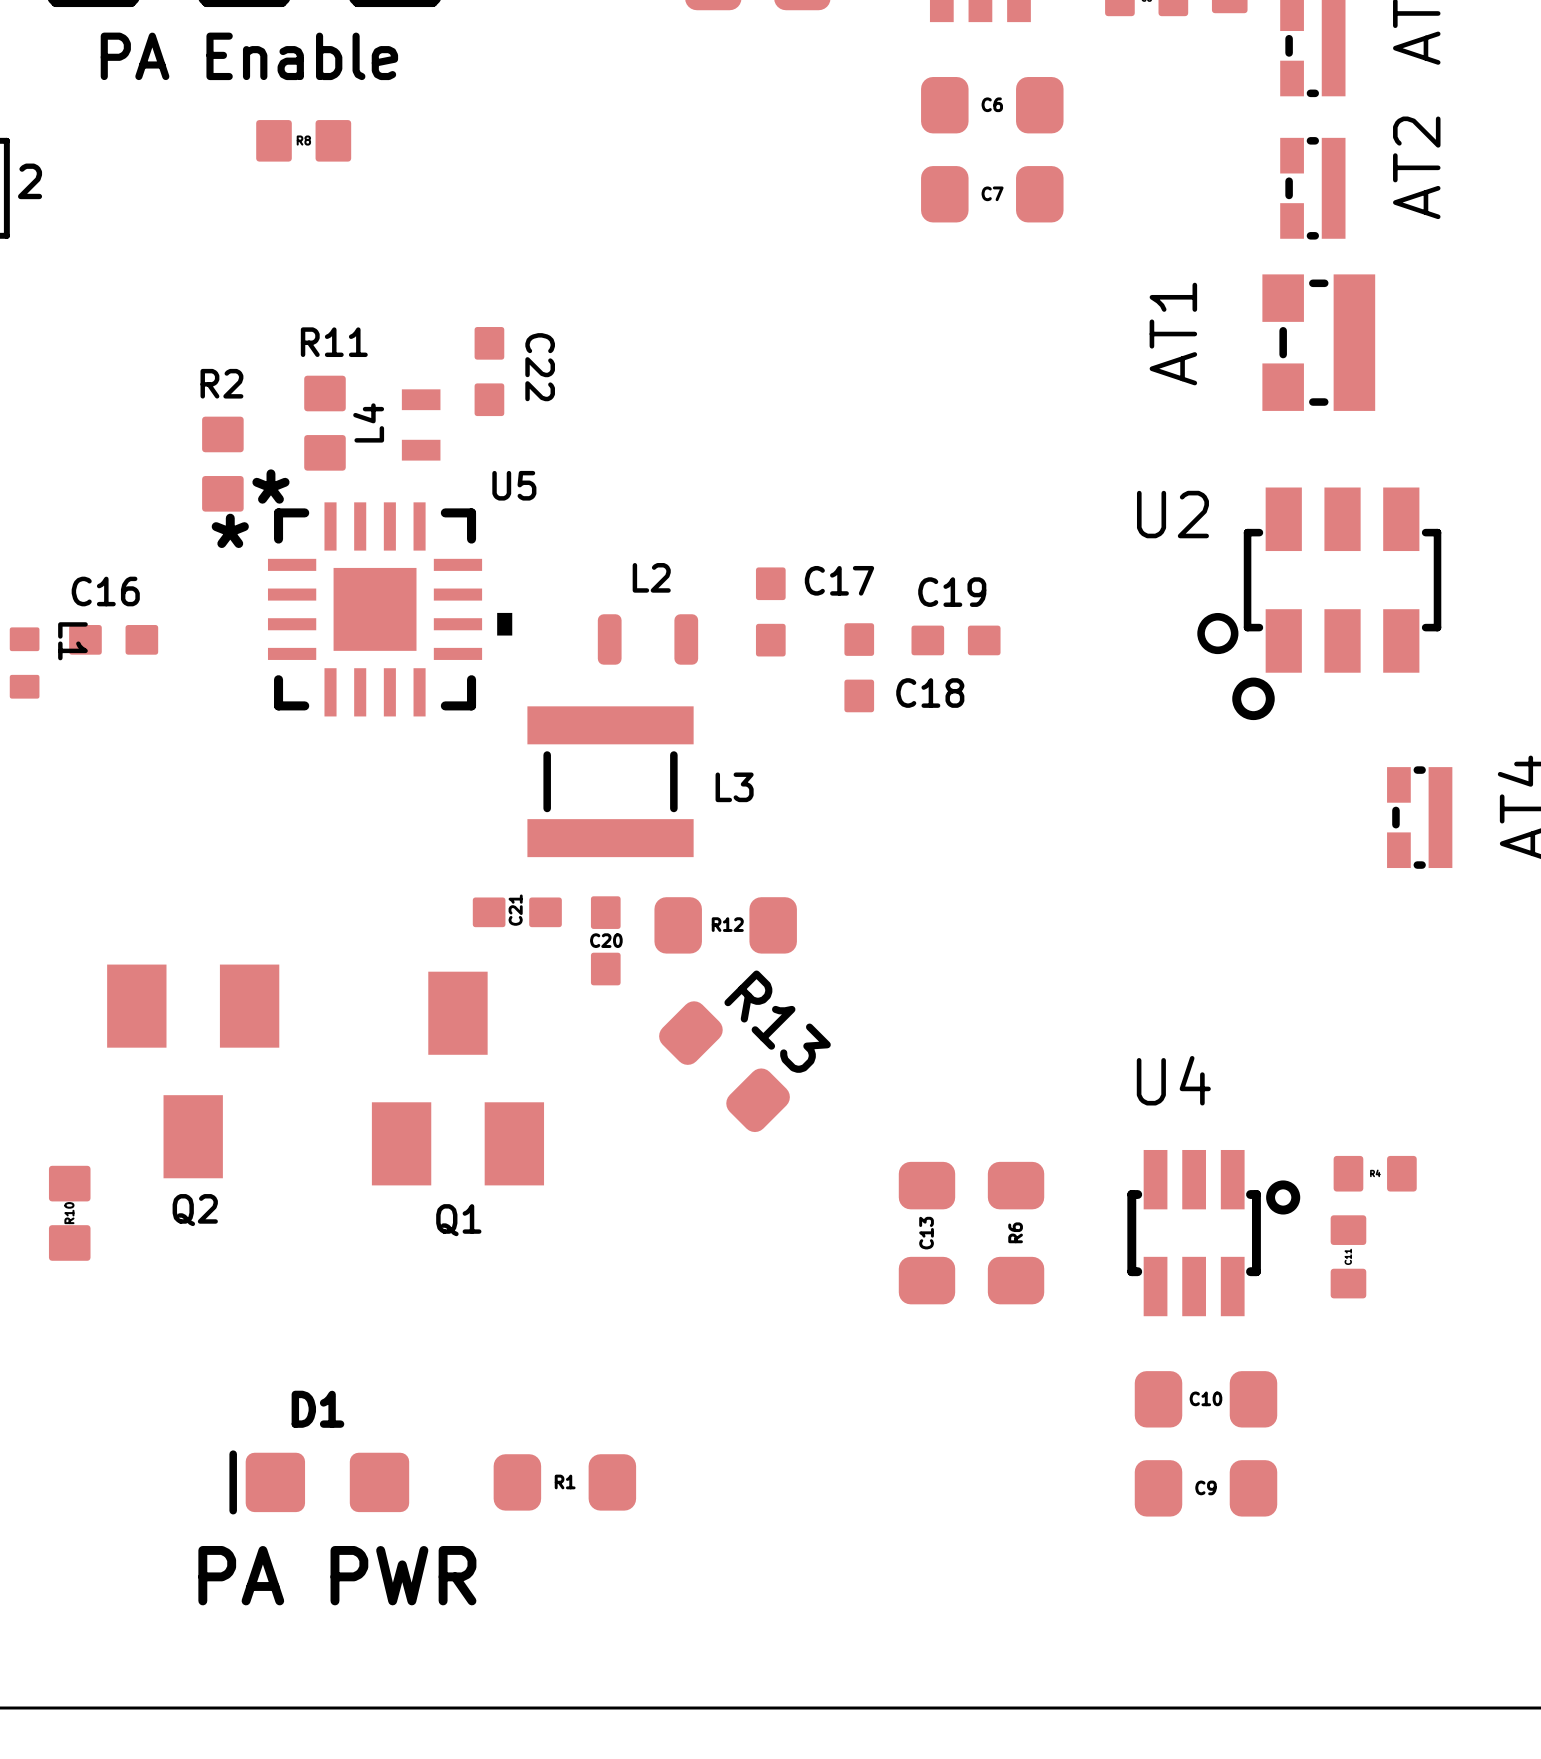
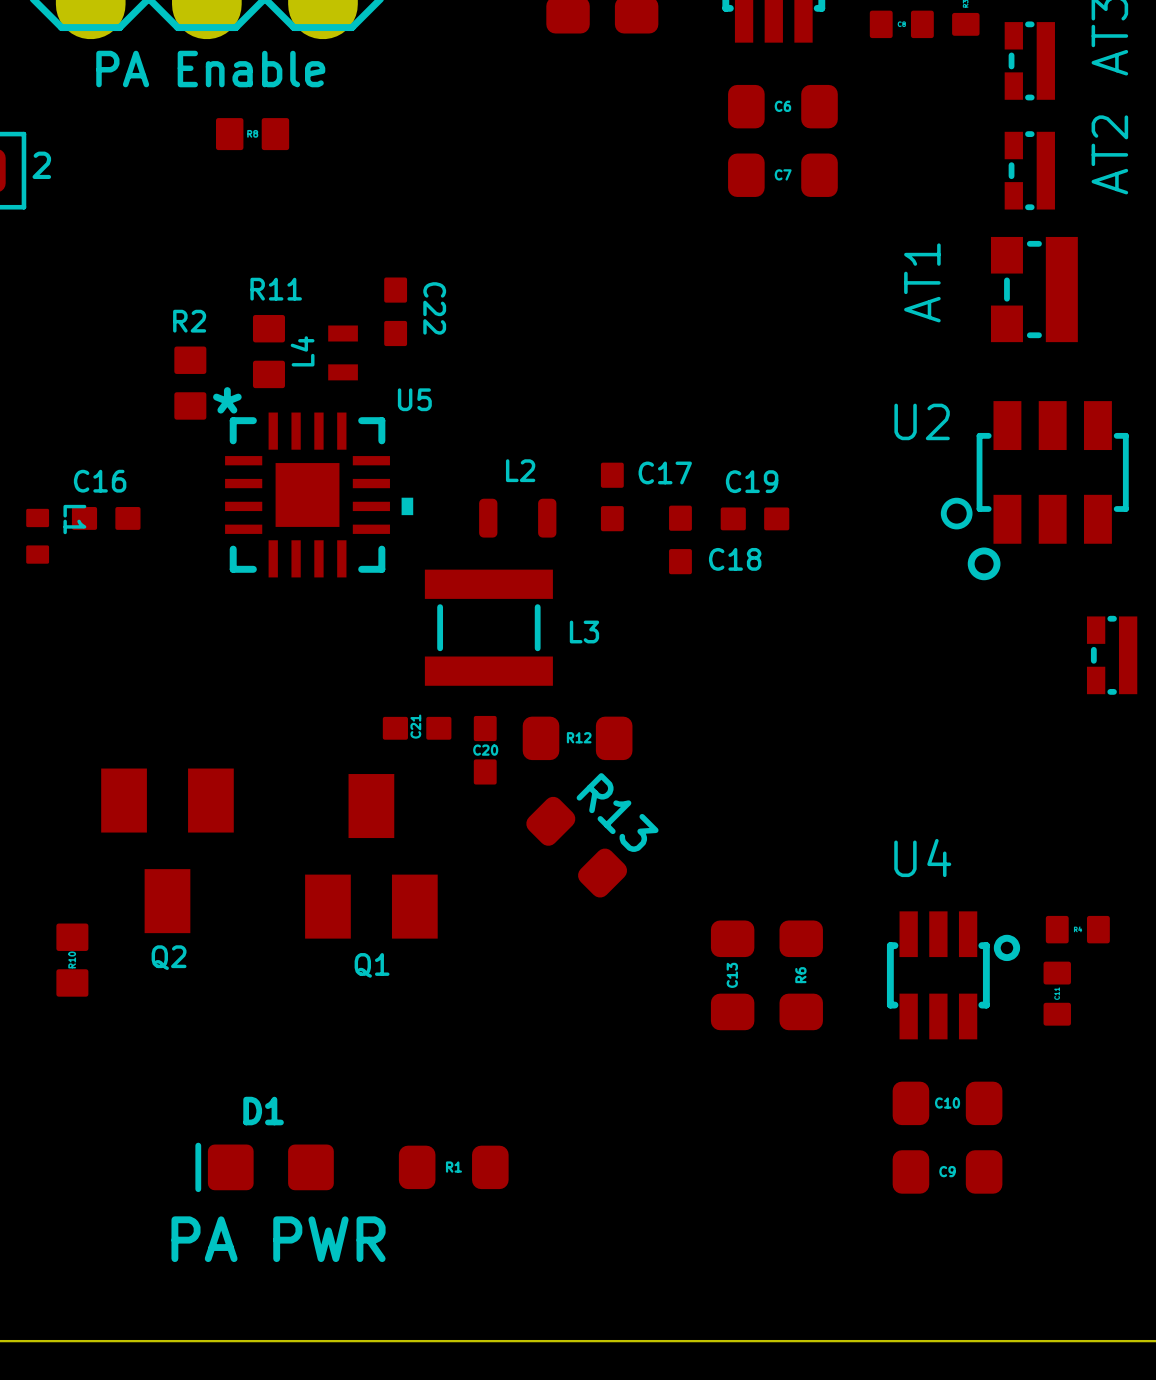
U5 text: * (230, 530) -> none

